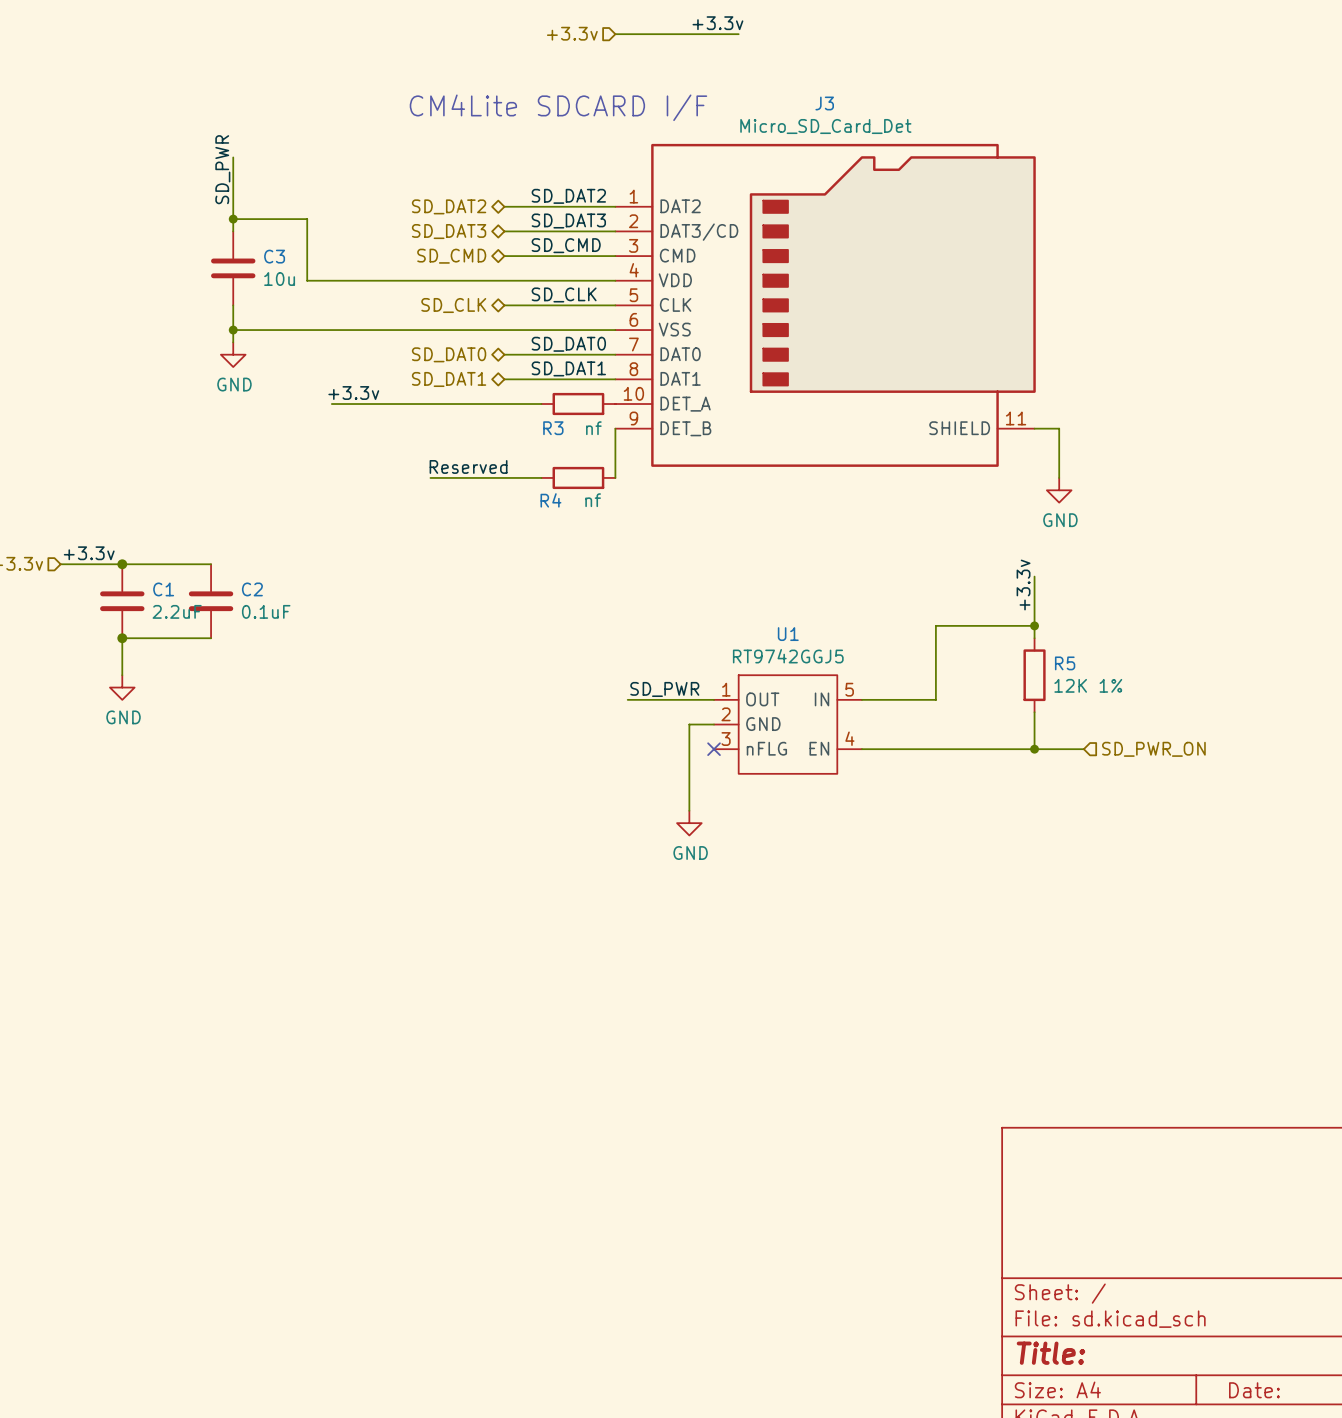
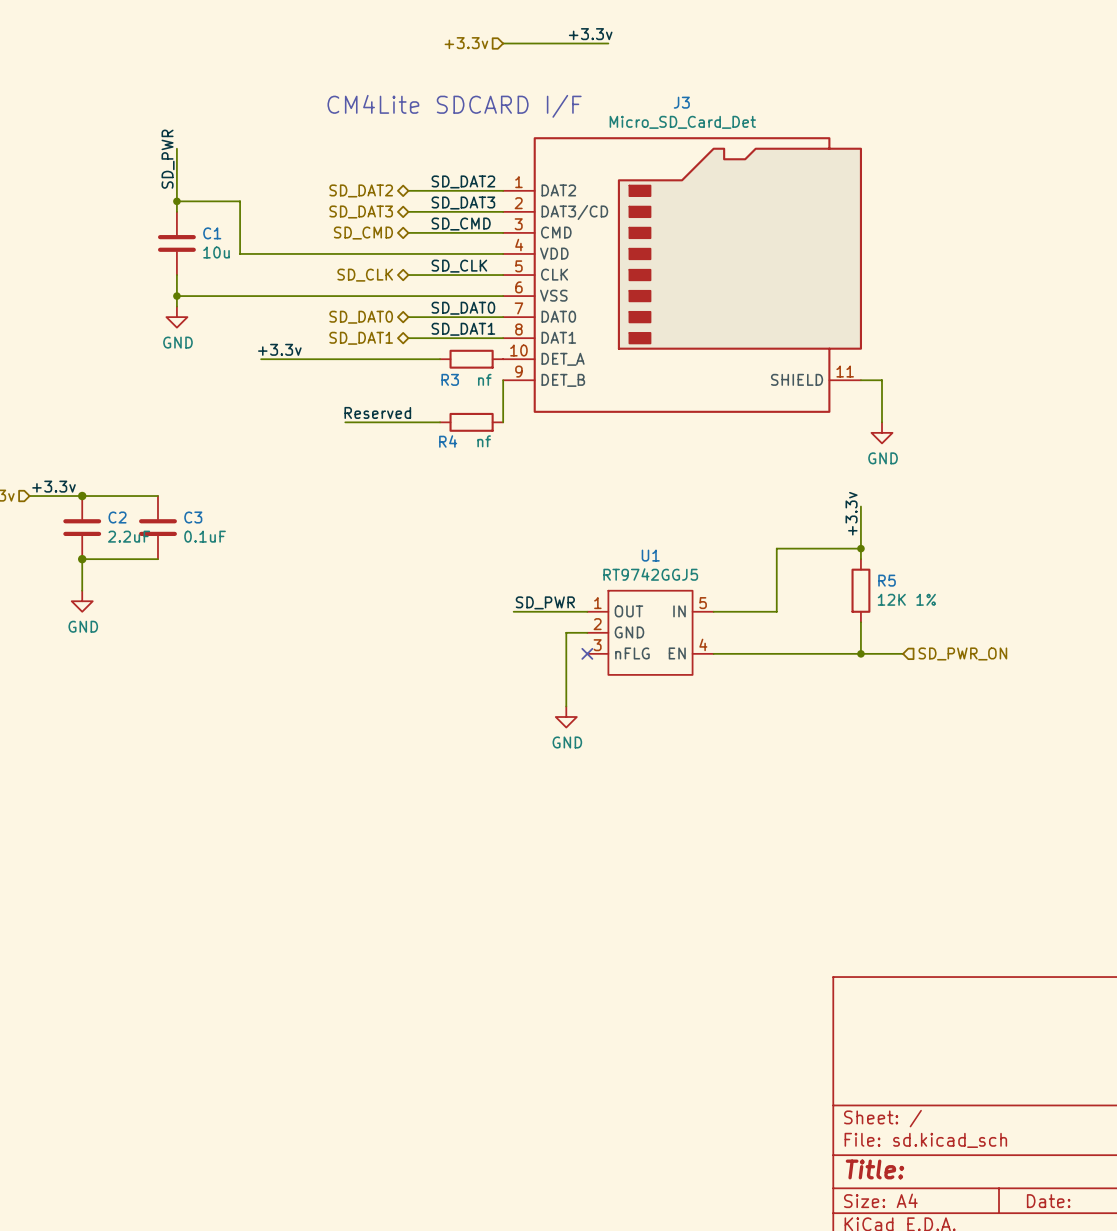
C3 name: C3 (274, 256) -> C1 (212, 233)
C1 name: C1 (163, 589) -> C2 (117, 517)
C2 name: C2 (252, 589) -> C3 (193, 517)

